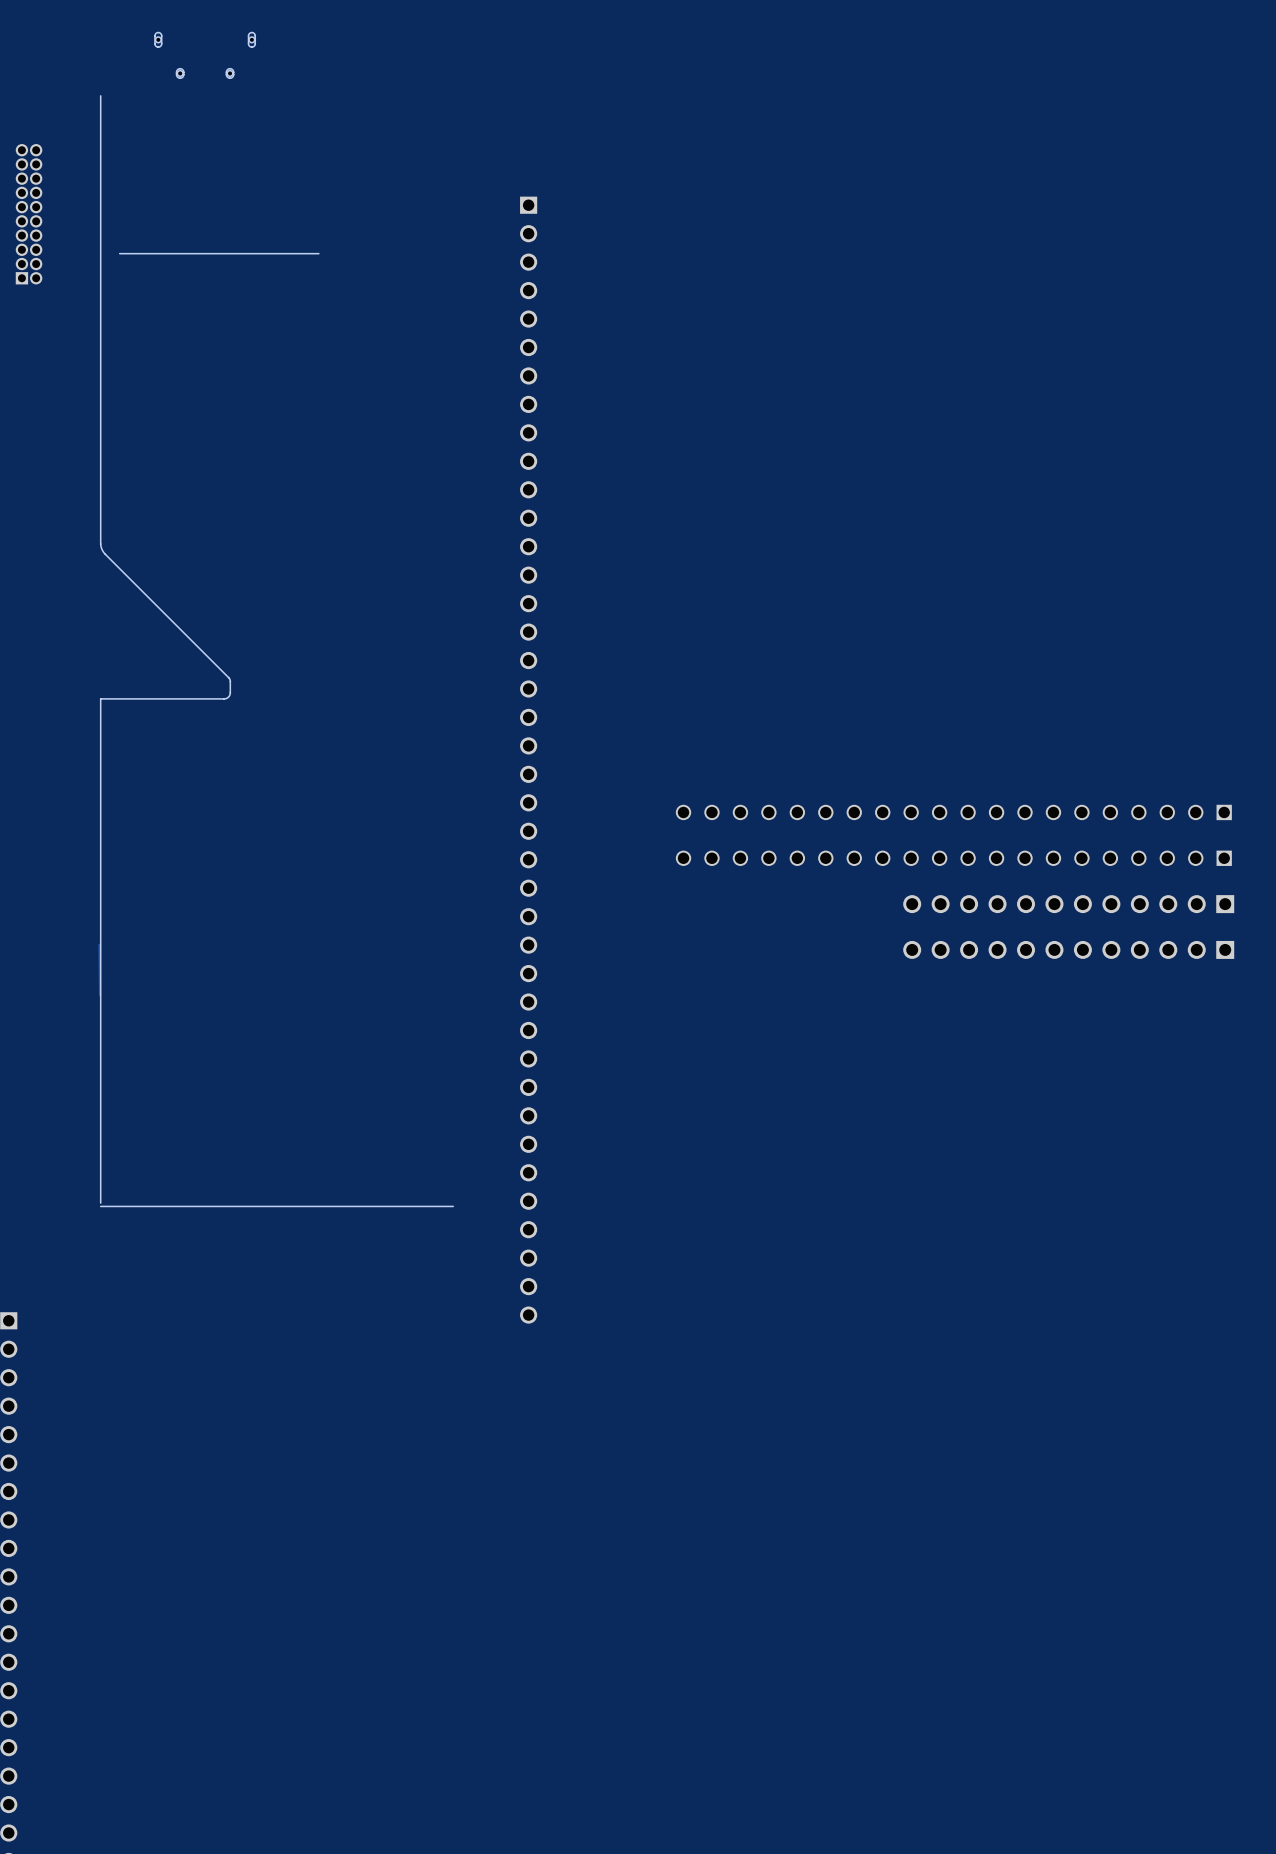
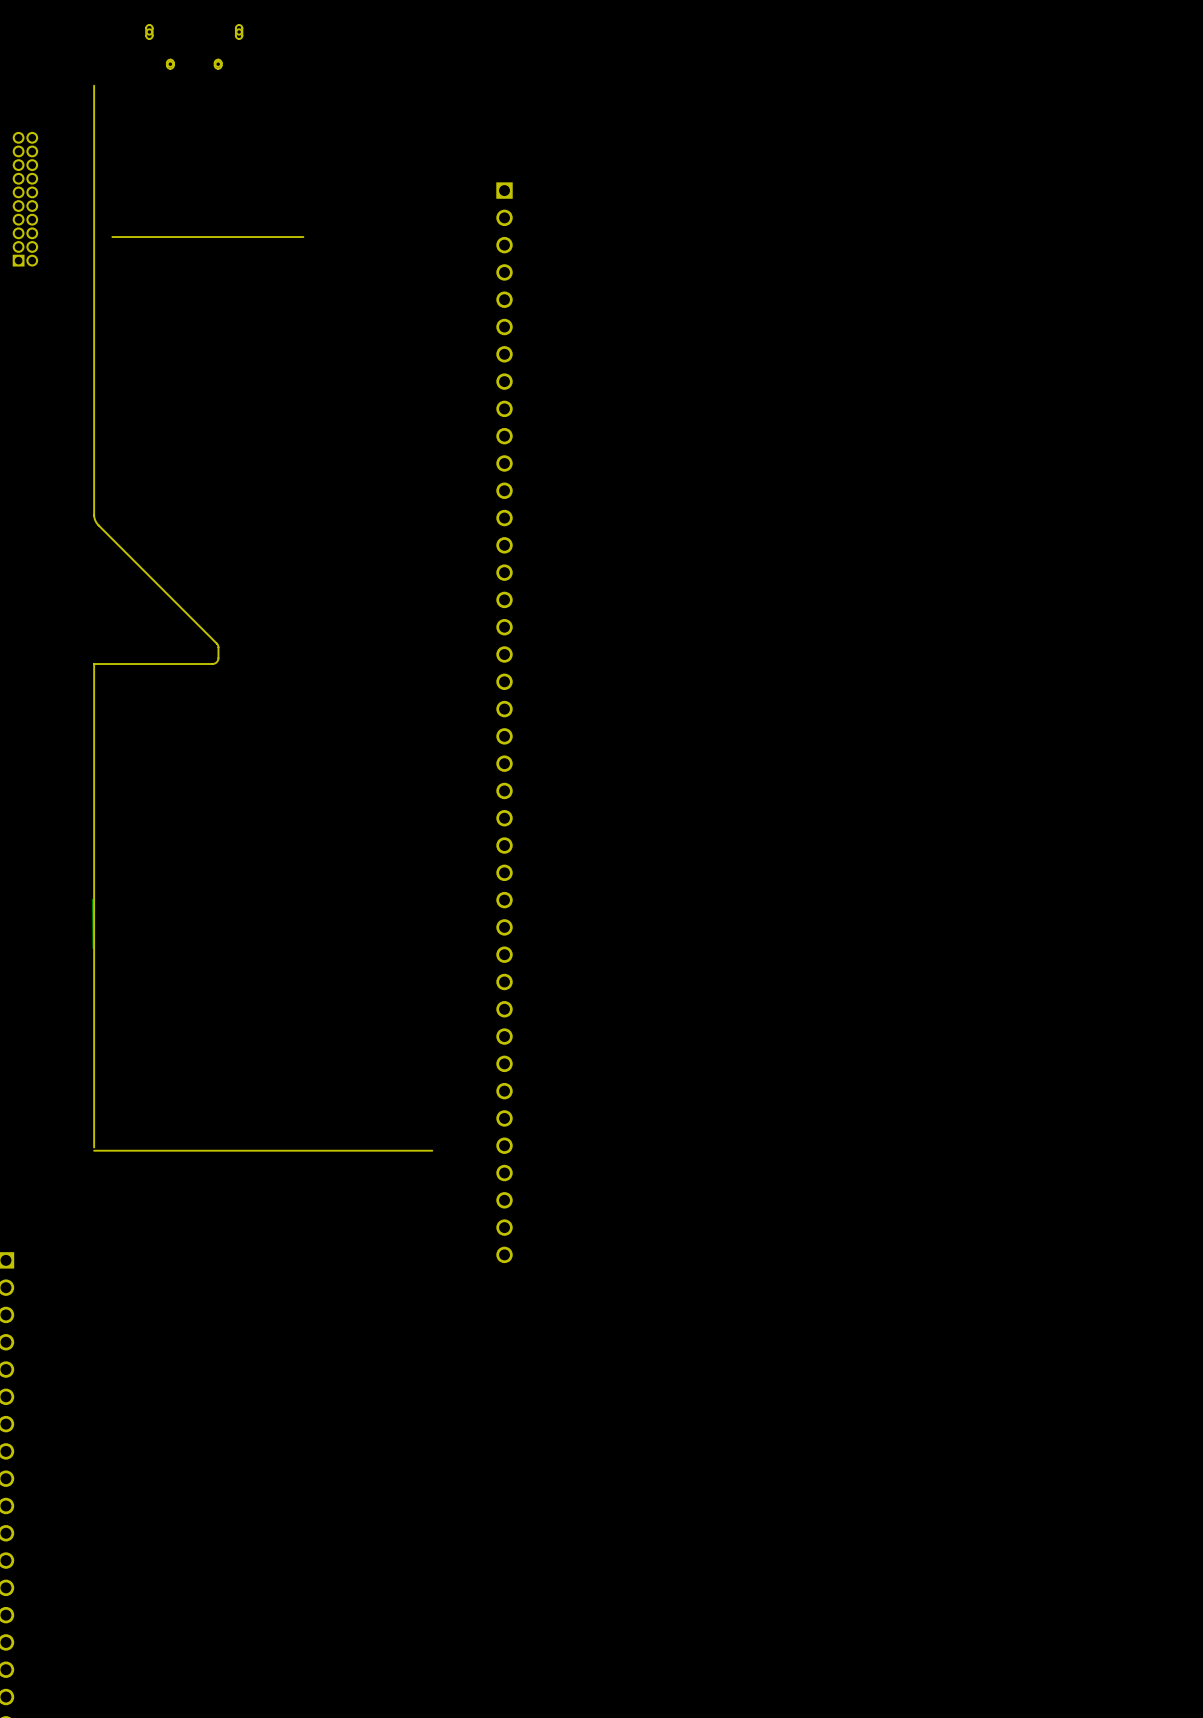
part: (953, 812) -> none
part: (953, 858) -> none
part: (1068, 904) -> none
part: (1068, 949) -> none

